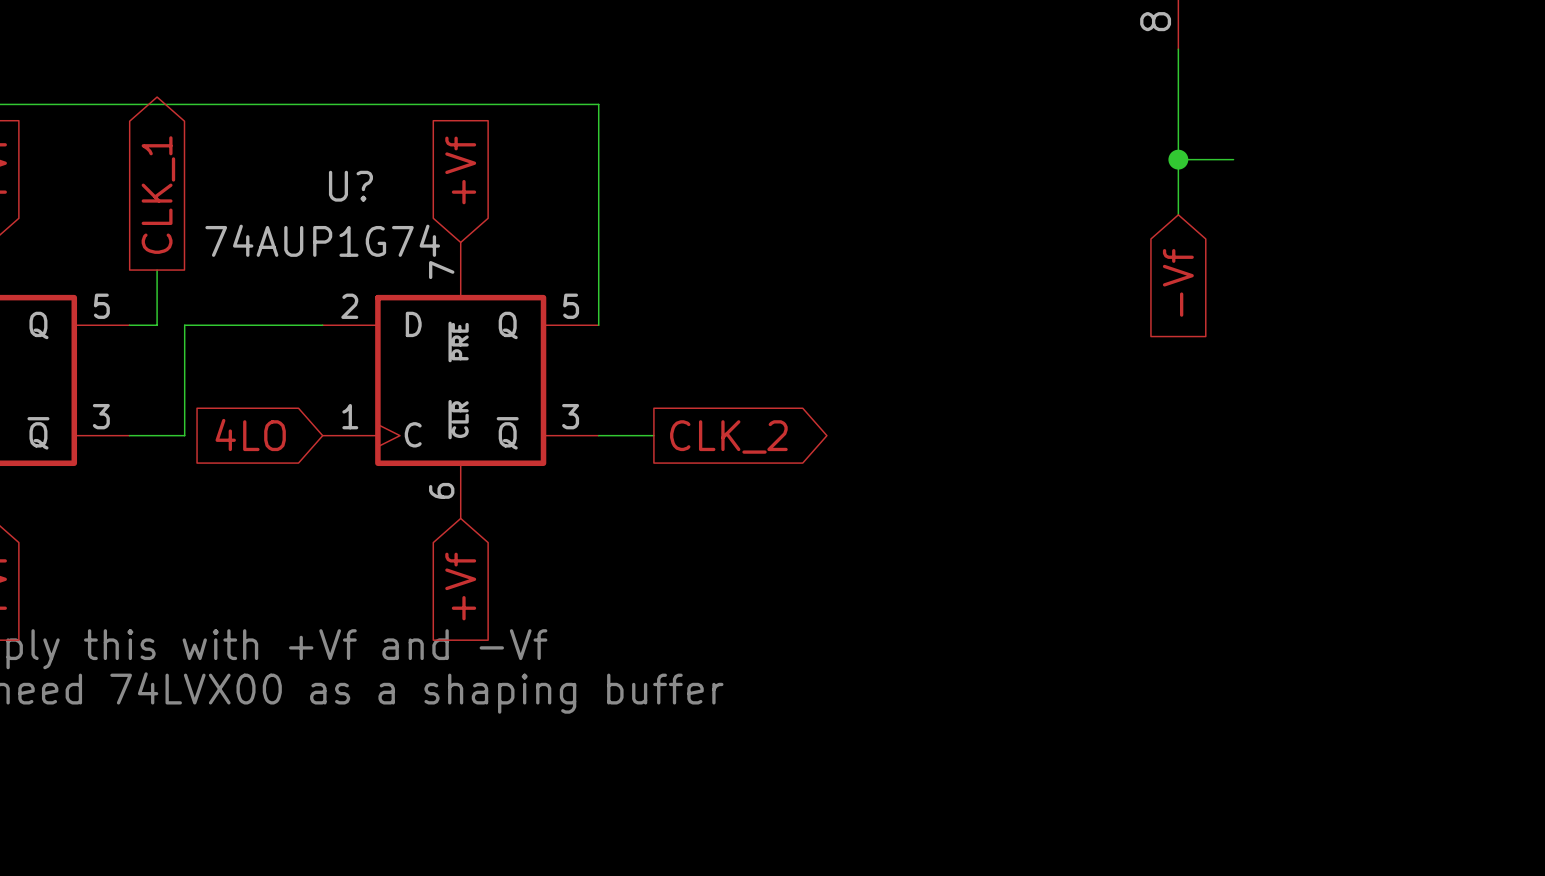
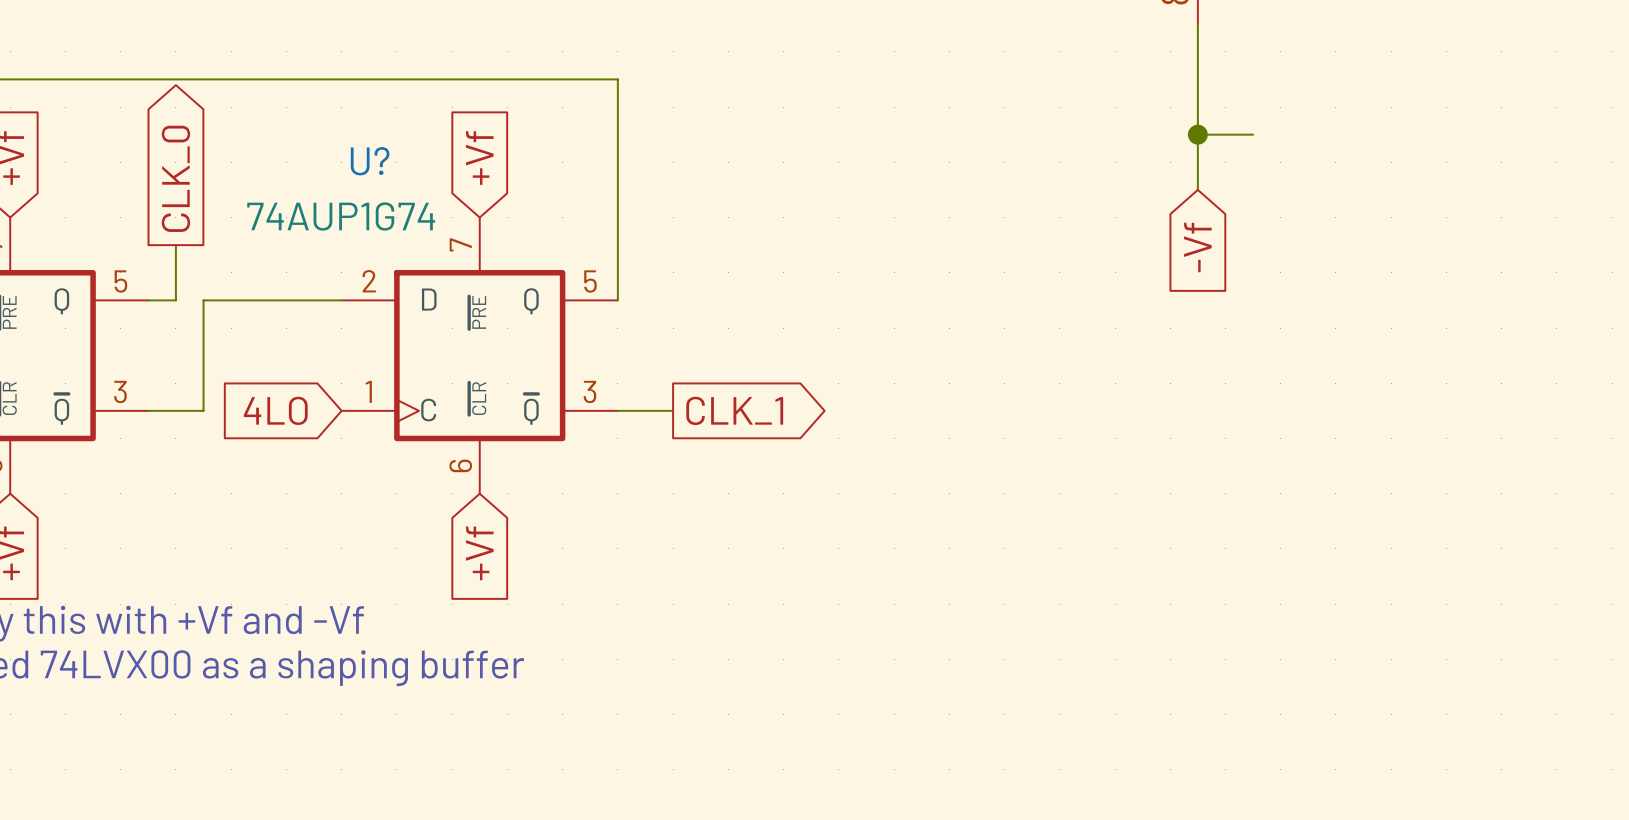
global label: CLK_1 (158, 195) -> CLK_0 (175, 178)
global label: CLK_2 (728, 436) -> CLK_1 (734, 410)

